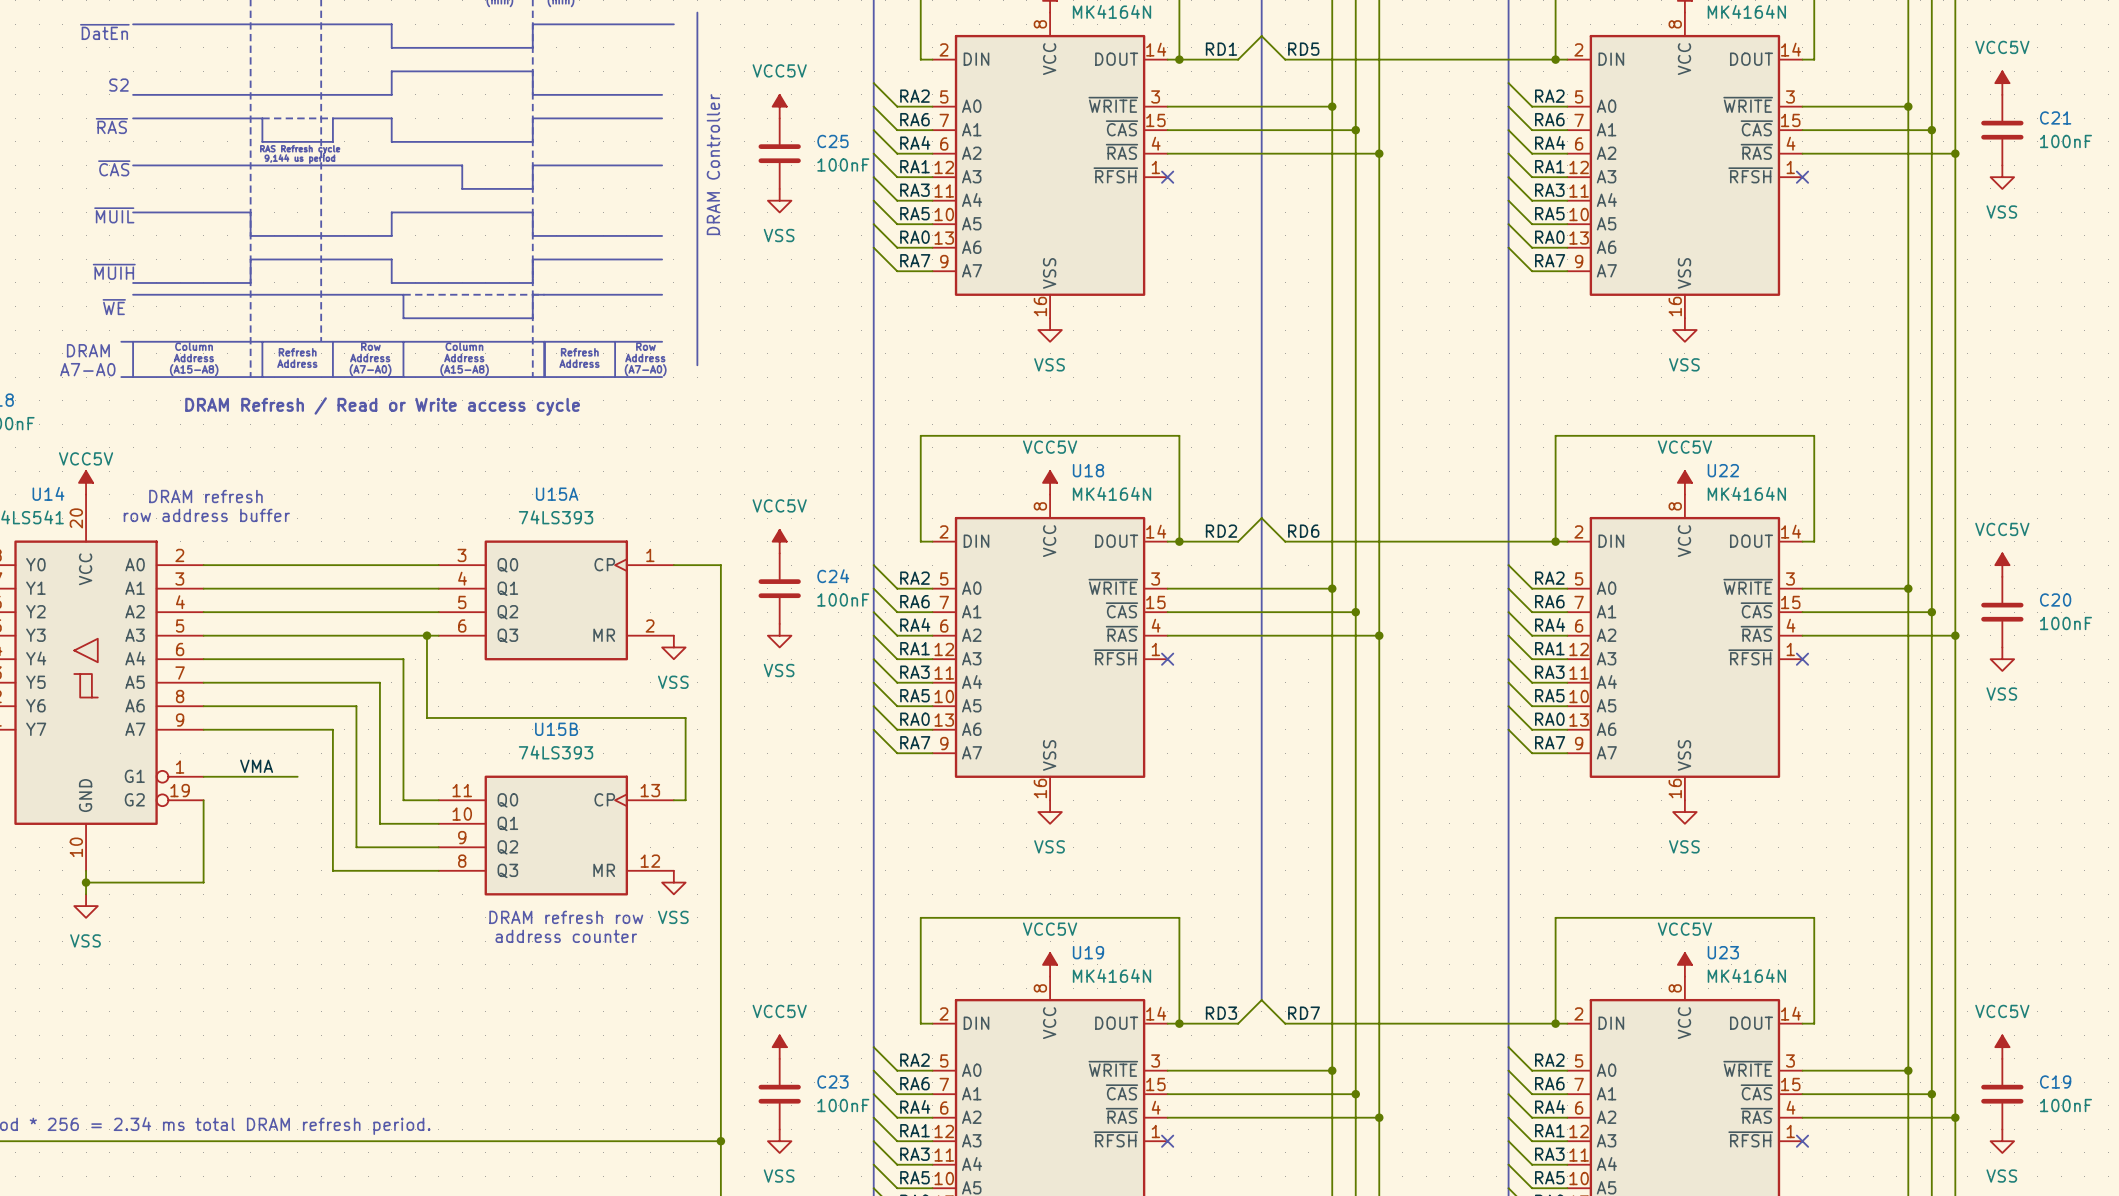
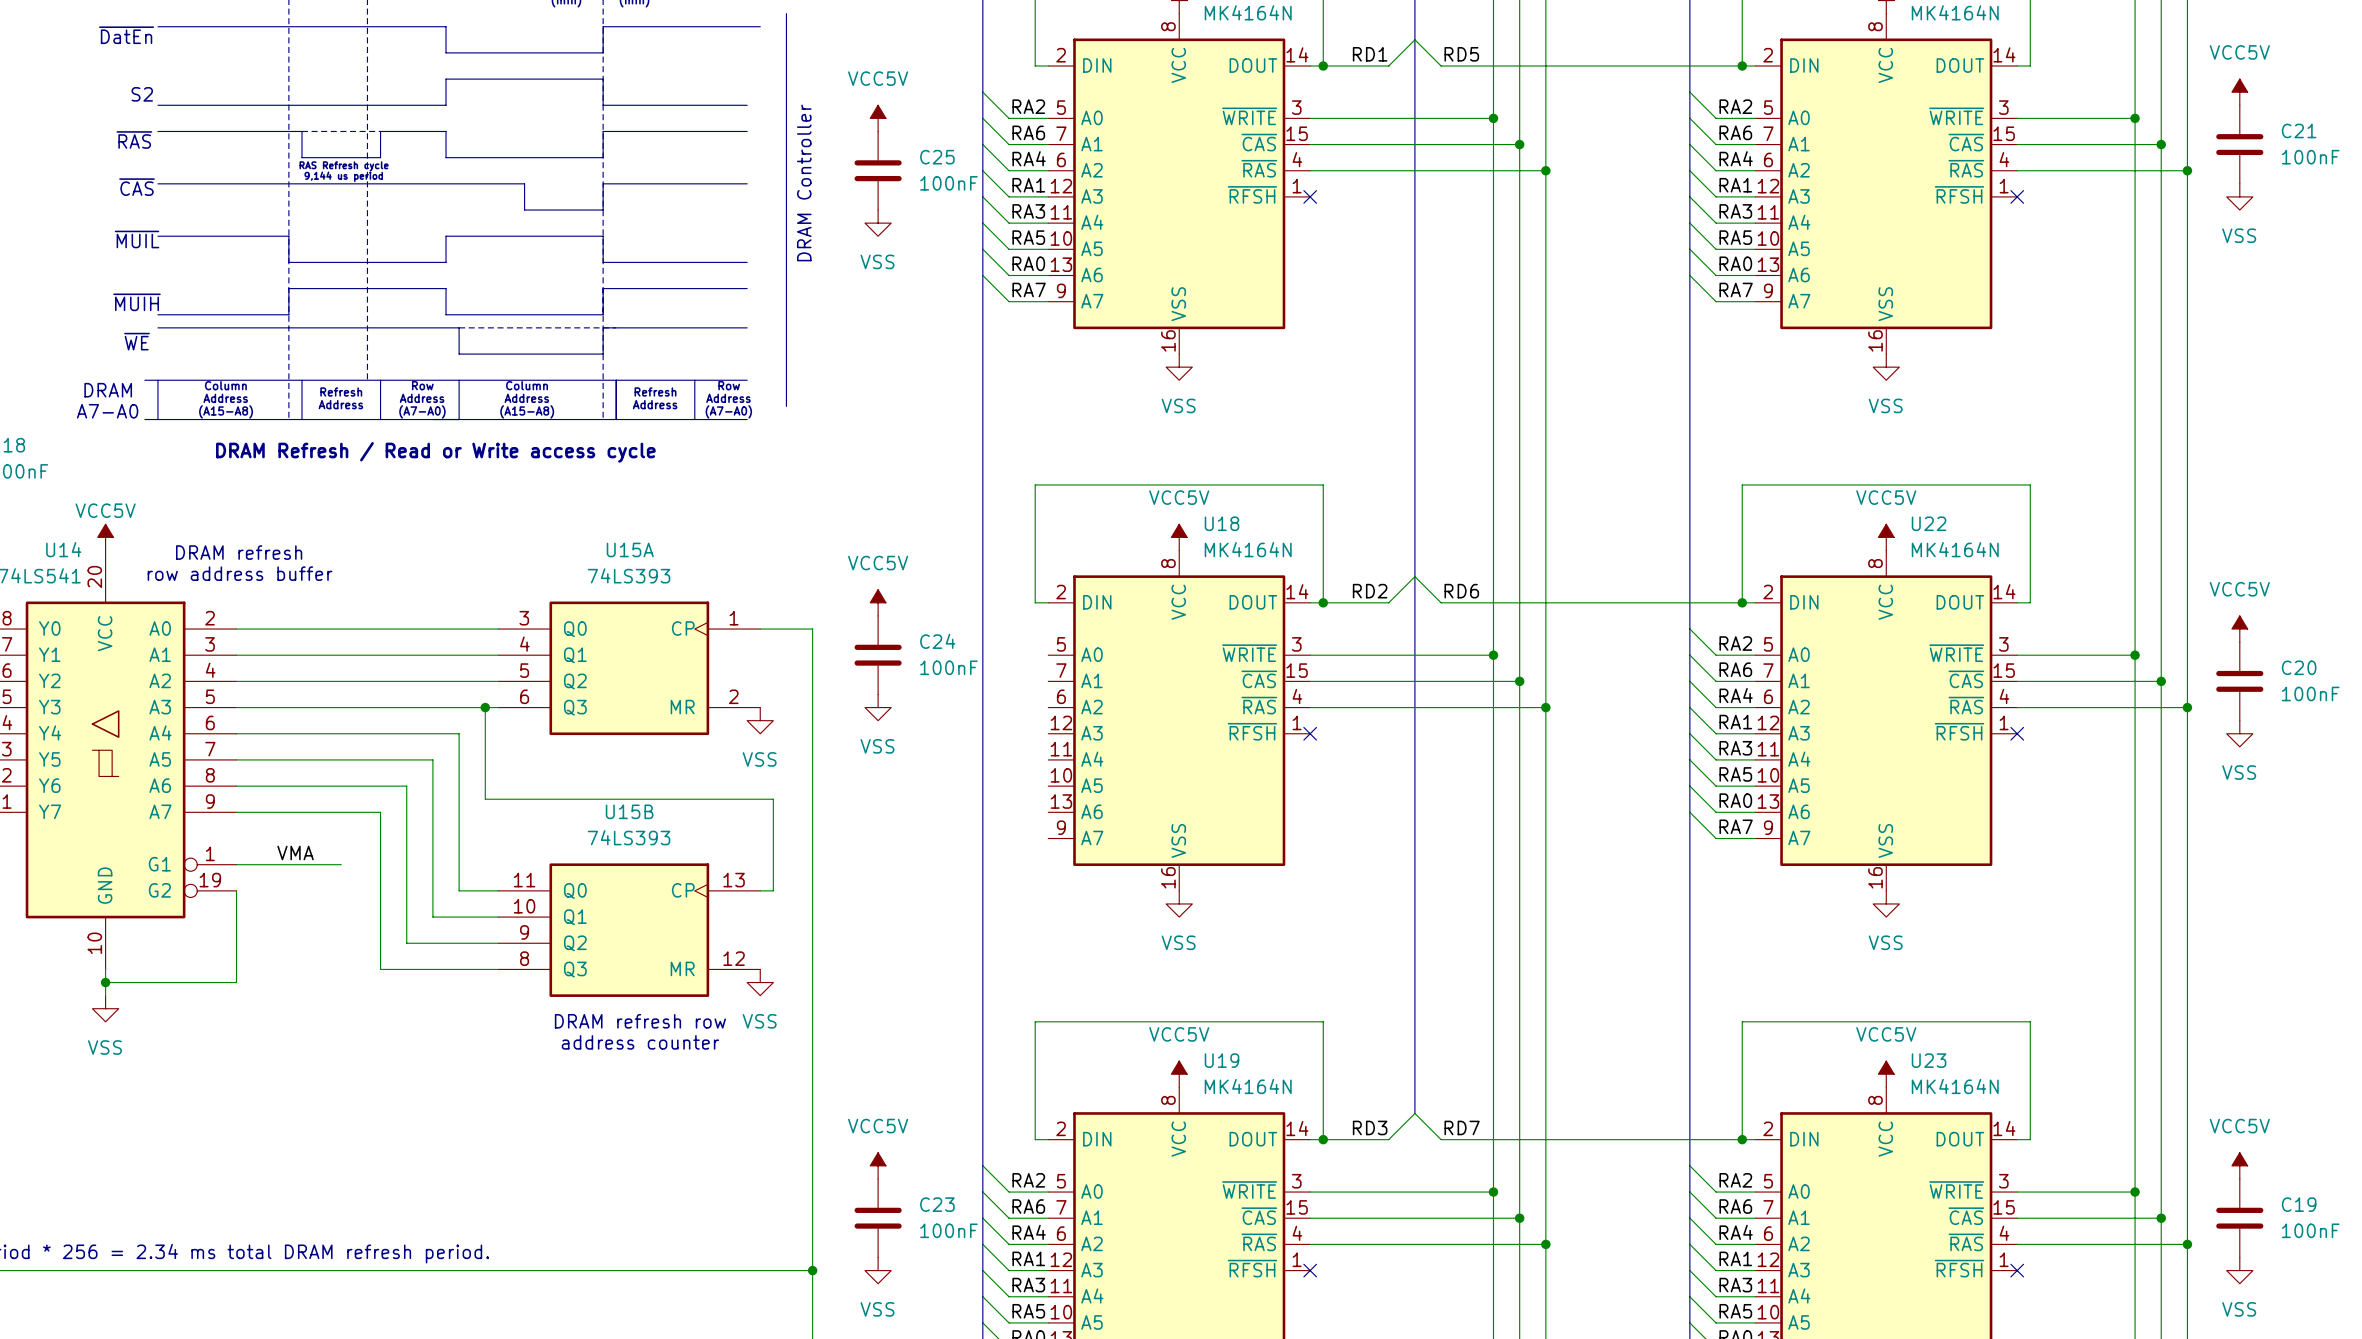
wire: (873, 565) (897, 588) (932, 588) -> none
label: RA2 (914, 578) -> none
wire: (873, 588) (897, 612) (932, 612) -> none
label: RA6 (914, 601) -> none
wire: (873, 612) (897, 635) (932, 635) -> none
label: RA4 (915, 624) -> none
wire: (873, 635) (897, 659) (932, 659) -> none
label: RA1 (914, 648) -> none
wire: (873, 659) (897, 682) (932, 682) -> none
label: RA3 (914, 672) -> none
wire: (873, 682) (897, 706) (932, 706) -> none
label: RA5 (914, 695) -> none
wire: (873, 706) (897, 729) (932, 729) -> none
label: RA0 (914, 719) -> none
wire: (873, 729) (897, 753) (932, 753) -> none
label: RA7 (915, 742) -> none

